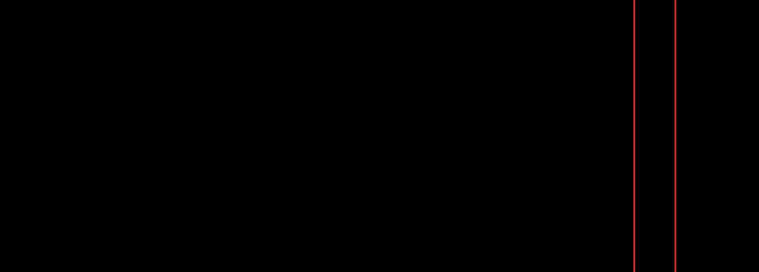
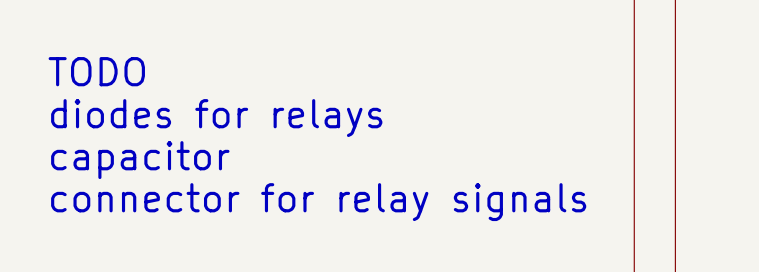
text: none -> TODO (96, 71)
text: none -> diodes for relays (216, 118)
text: none -> capacitor (140, 160)
text: none -> connector for relay signals (318, 202)

